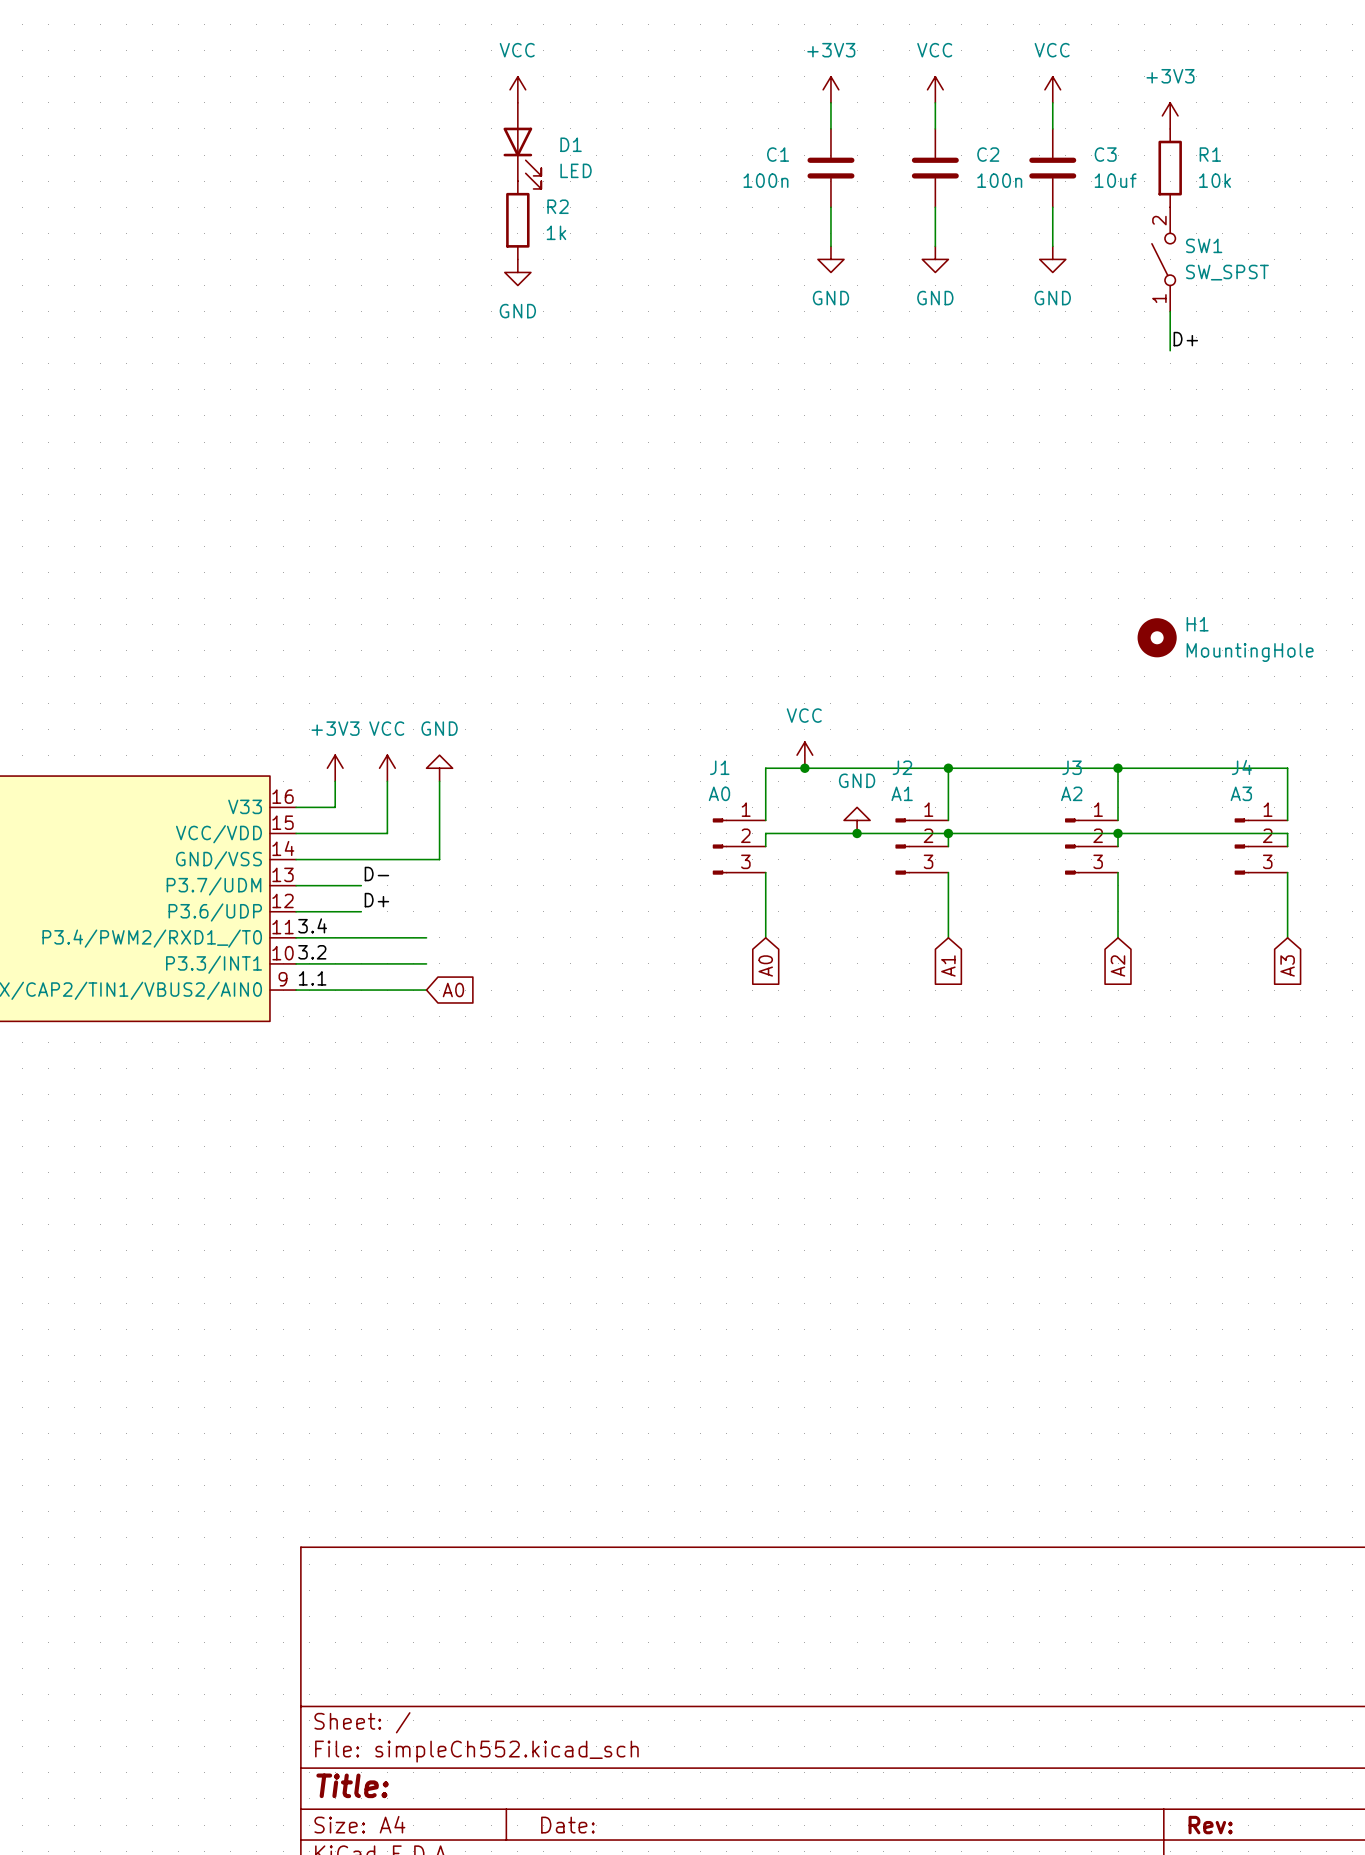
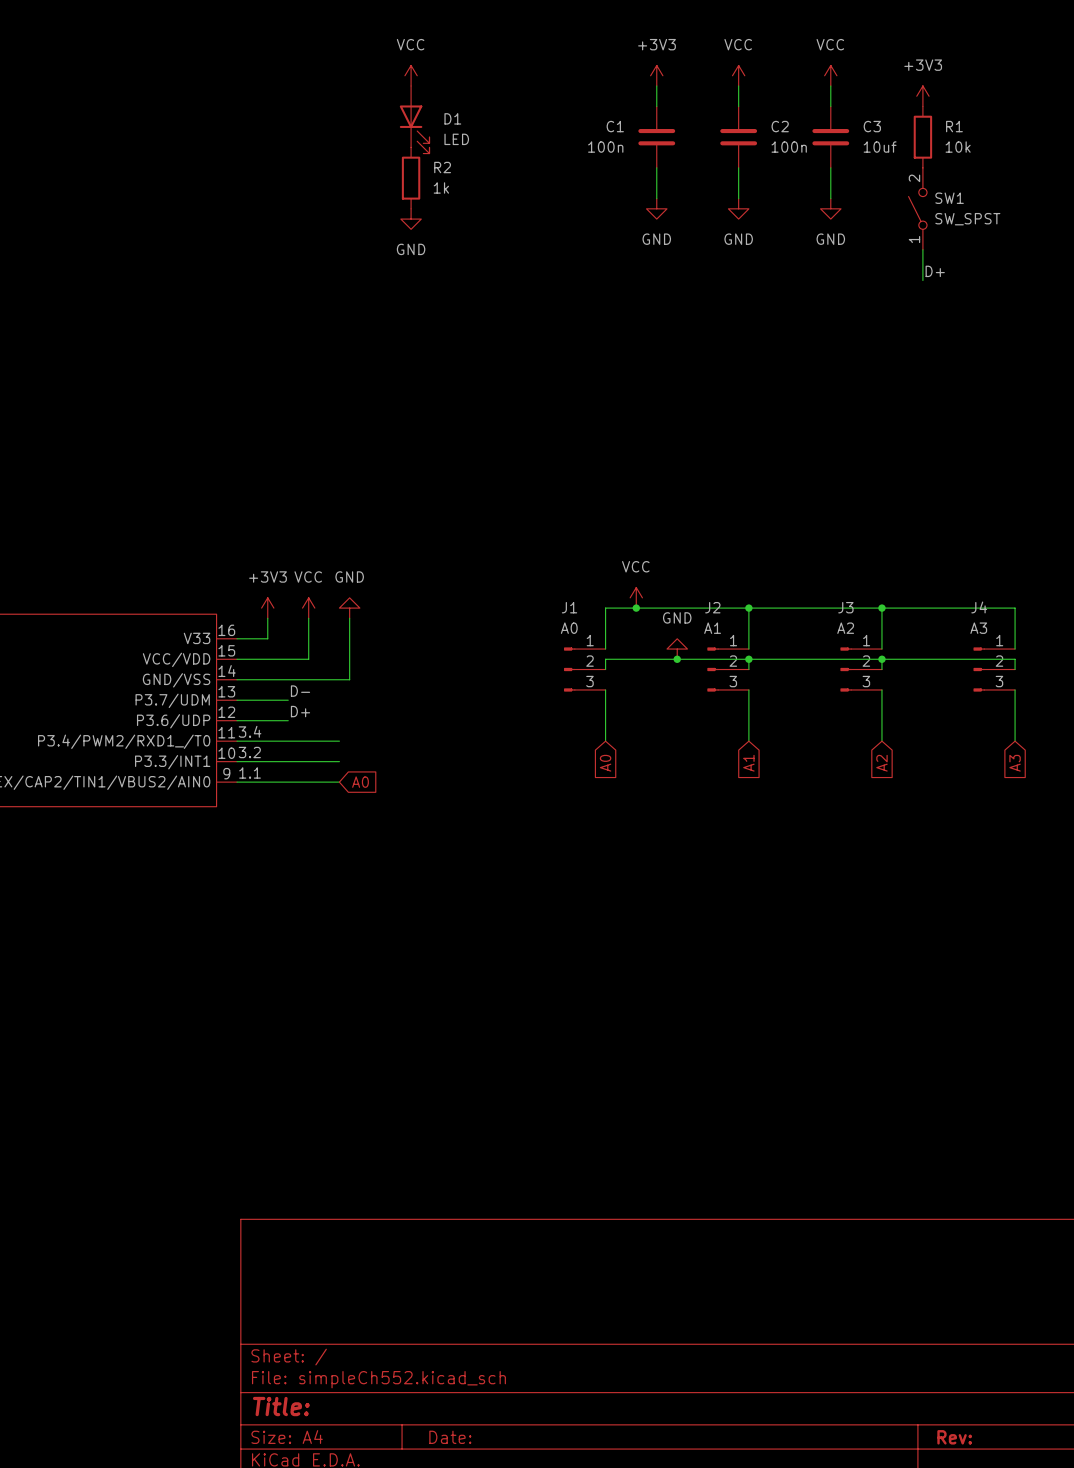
H1: MountingHole (1157, 637) -> none

